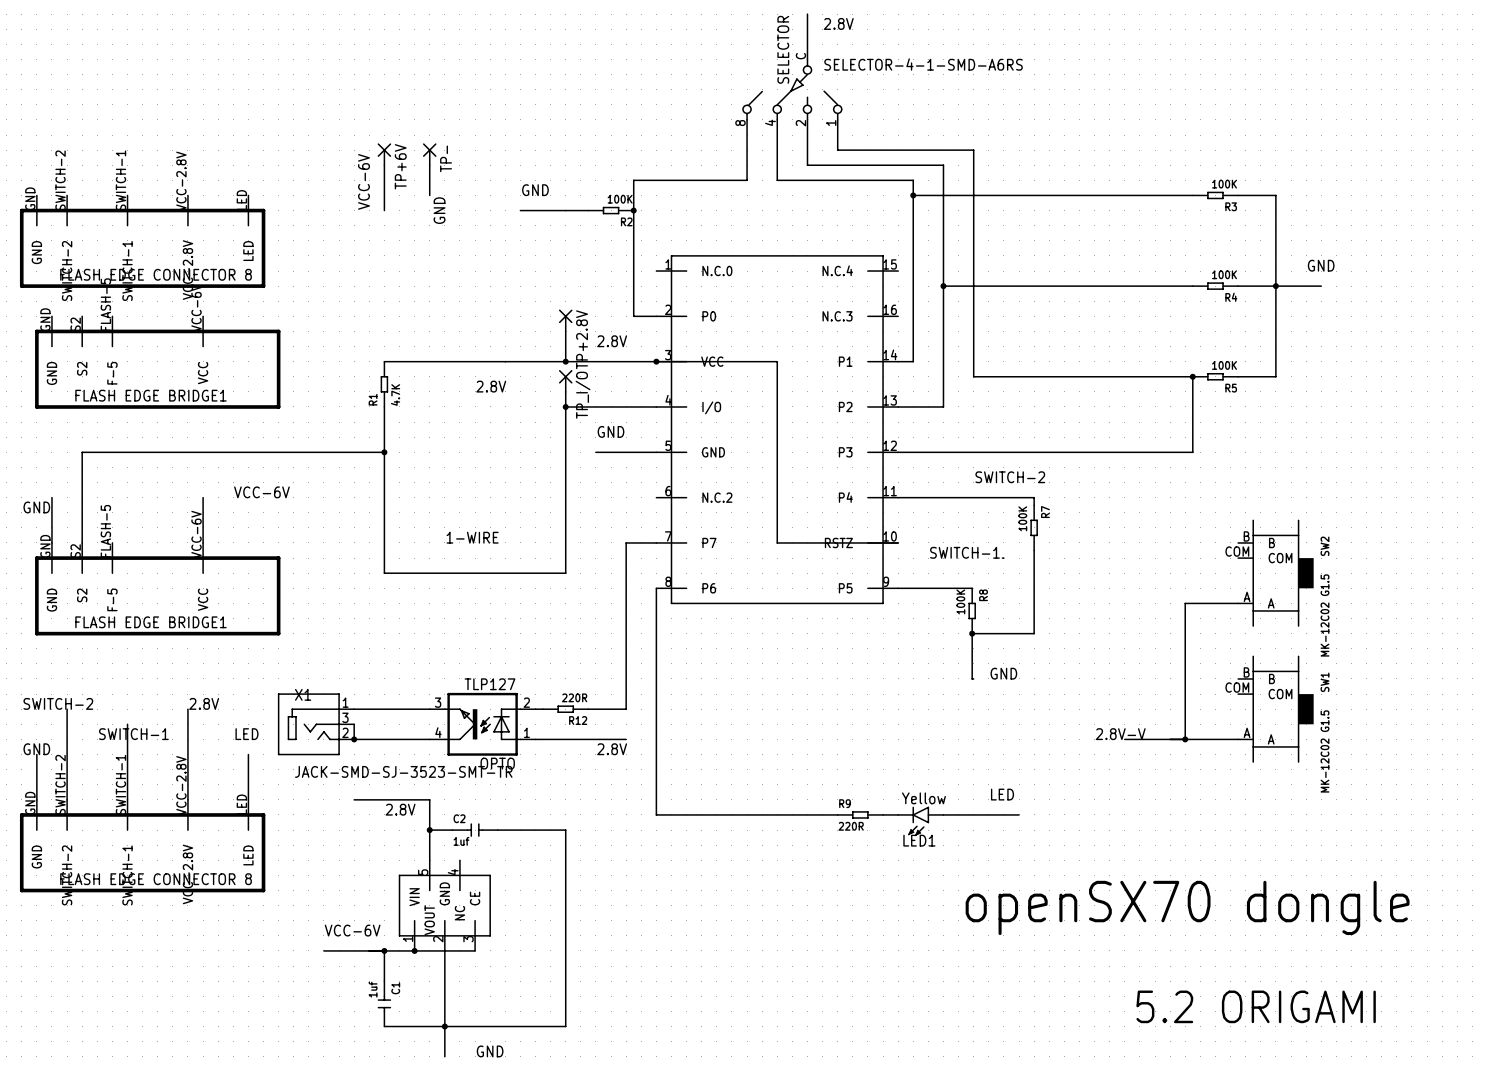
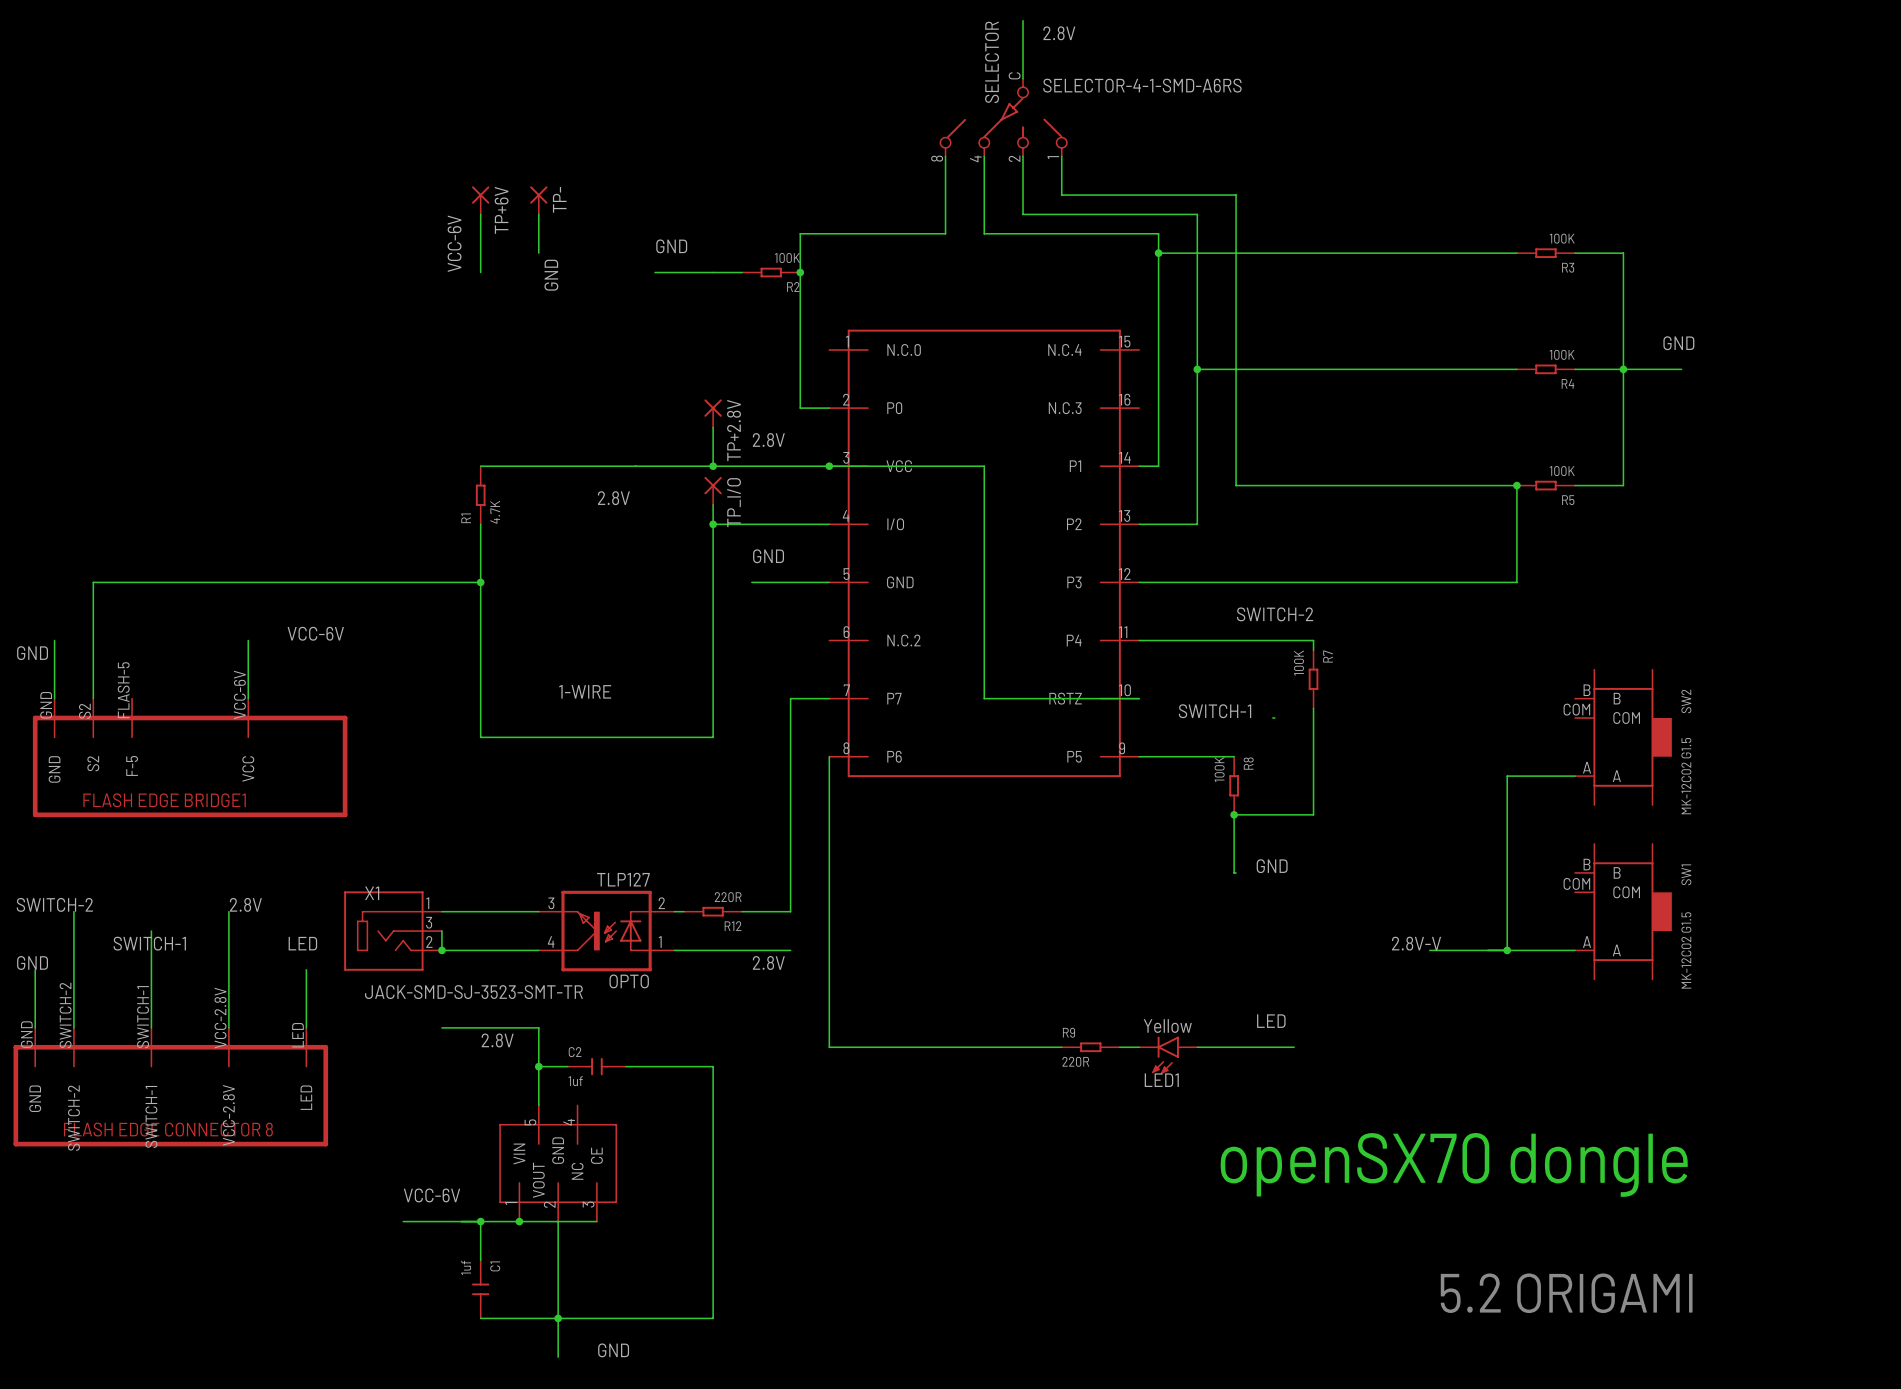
part: (142, 241) -> none
part: (157, 362) -> none

